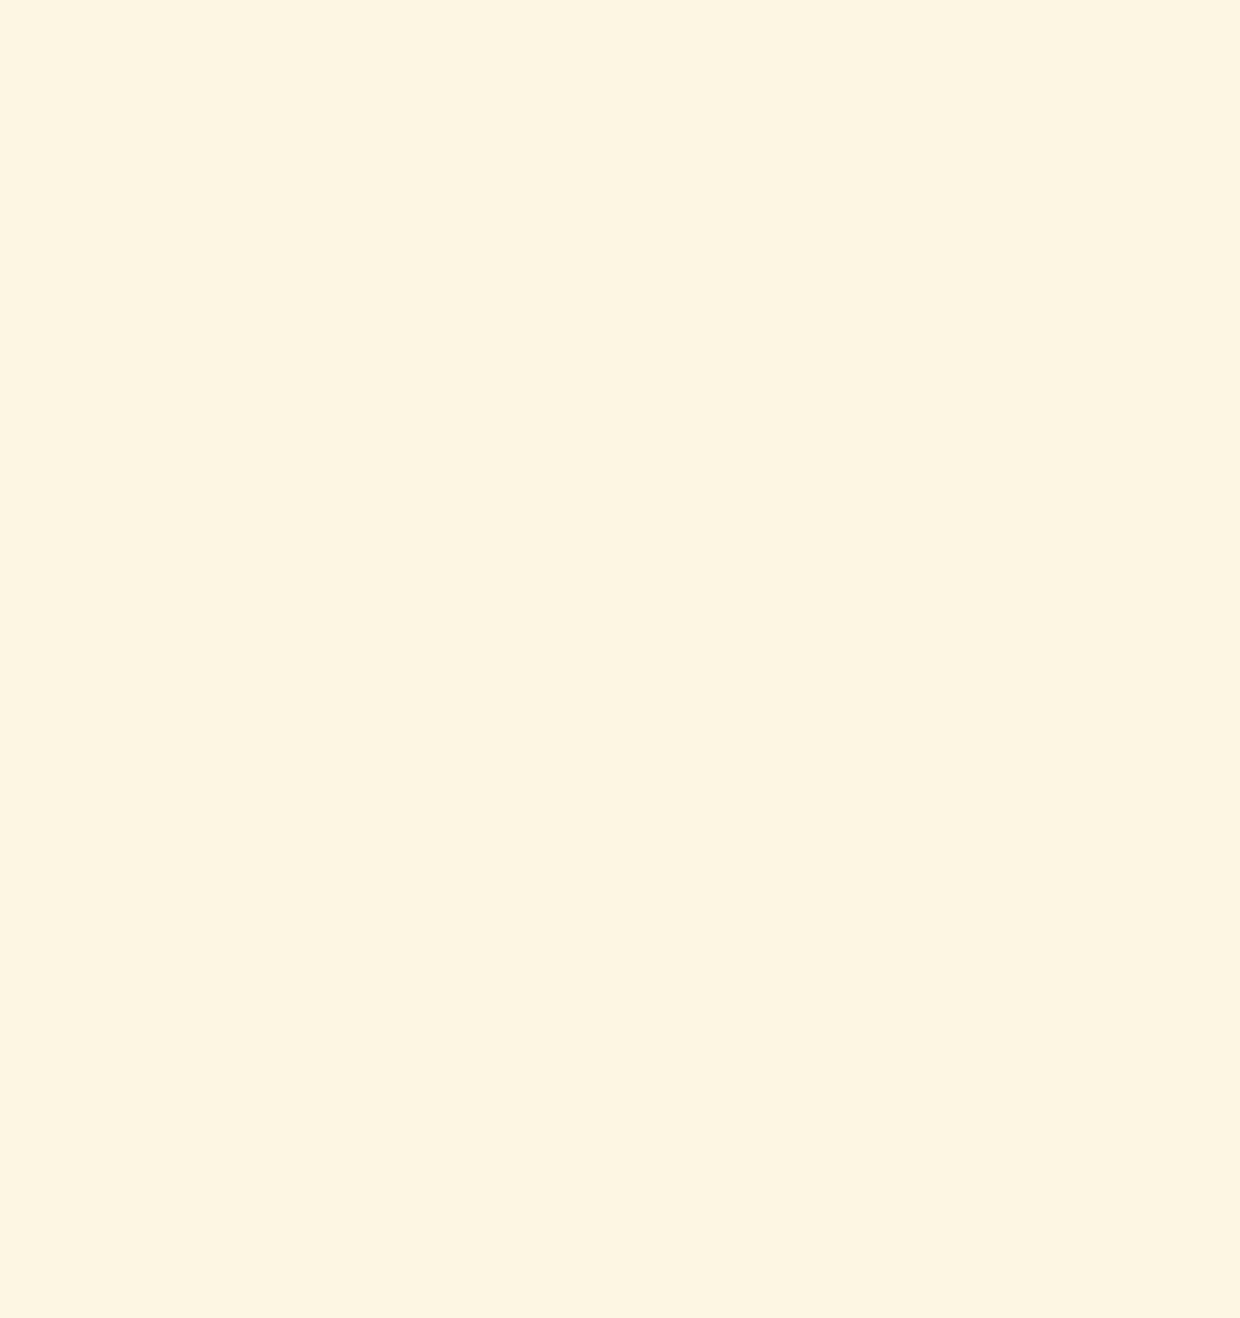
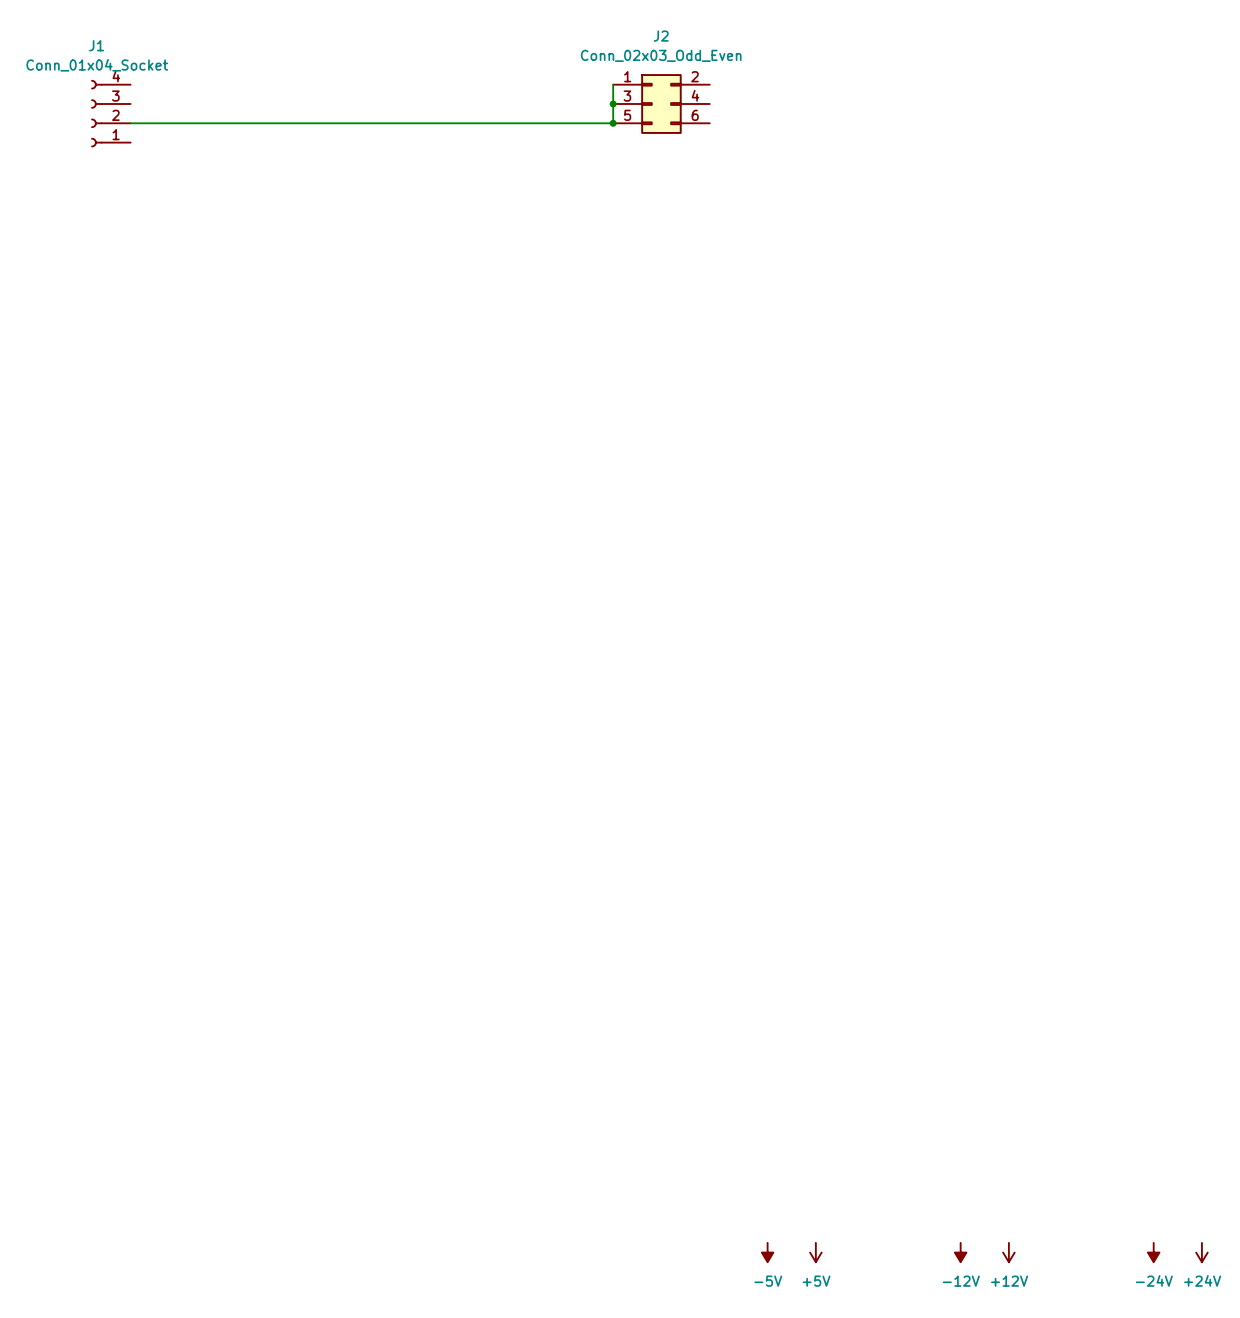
wire: none -> (613, 84) (613, 123) (130, 123)
junction: none -> (613, 103)
J2: none -> Conn_02x03_Odd_Even (661, 103)
J1: none -> Conn_01x04_Socket (110, 113)
junction: none -> (613, 123)
power symbol: none -> -5V (767, 1252)
power symbol: none -> +5V (815, 1252)
power symbol: none -> -12V (960, 1252)
power symbol: none -> +12V (1008, 1252)
power symbol: none -> -24V (1153, 1252)
power symbol: none -> +24V (1201, 1252)

